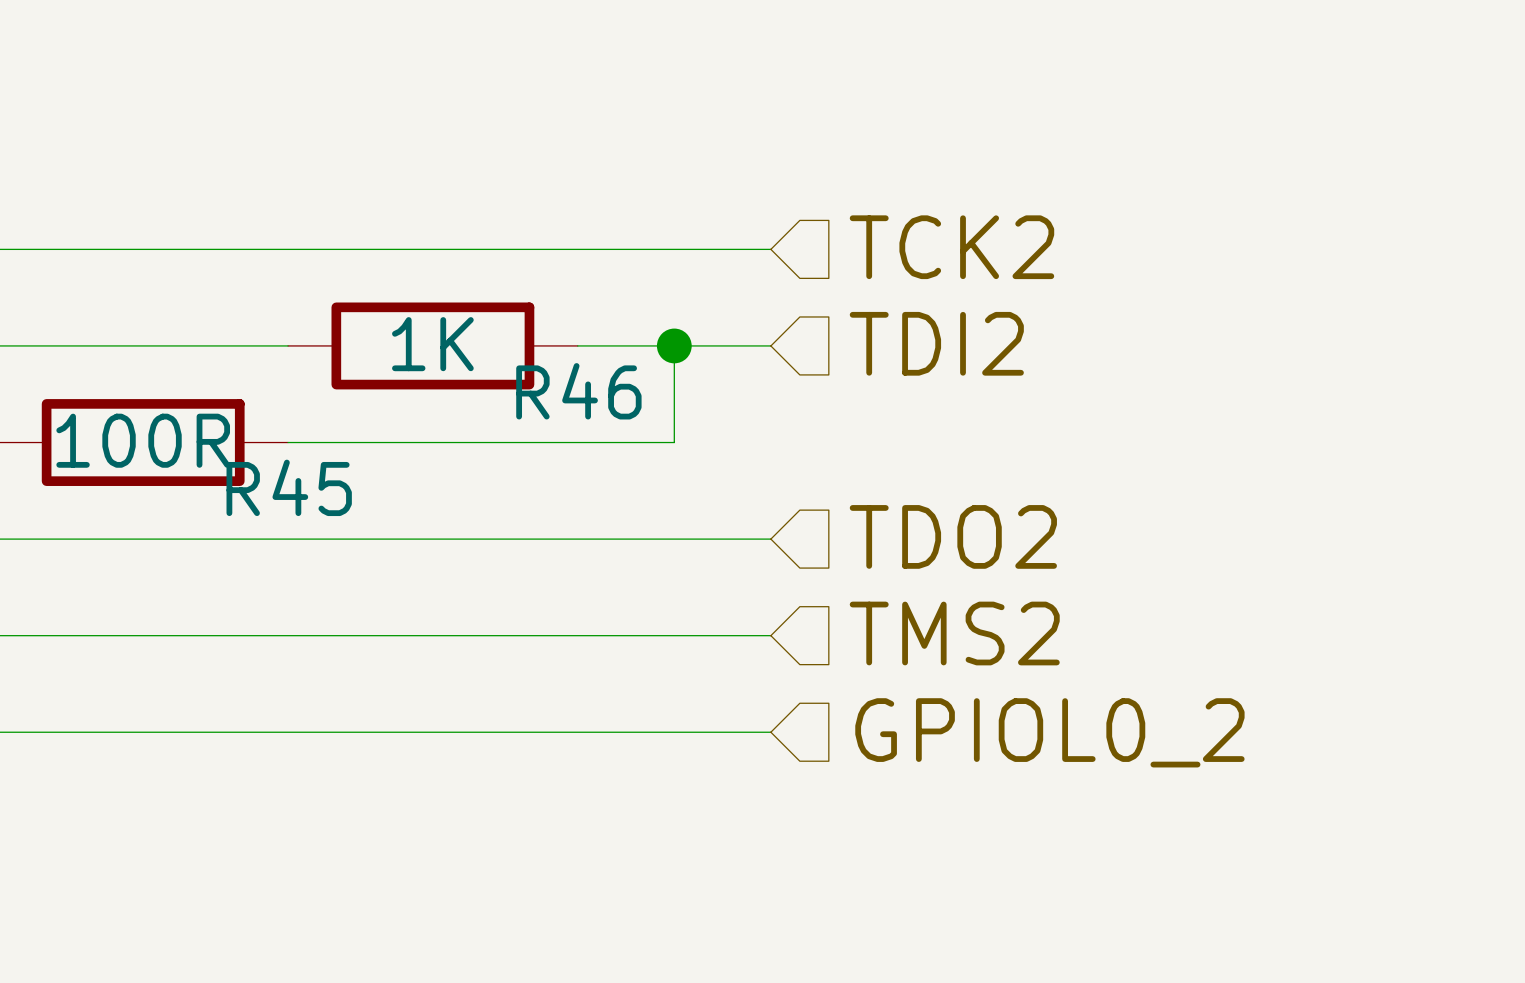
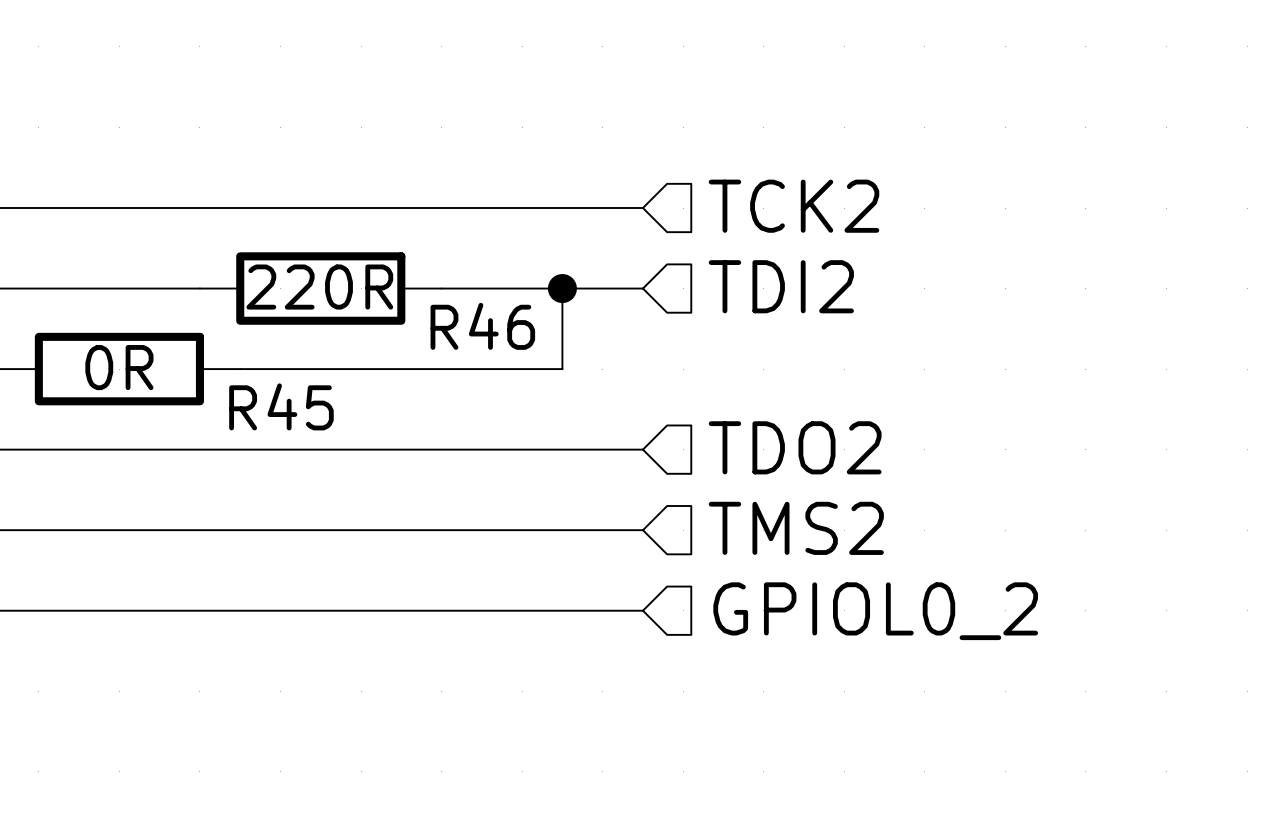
R46 value: 1K (432, 344) -> 220R (319, 287)
R46 position: (432, 345) -> (320, 288)
R45 value: 100R (143, 440) -> 0R (119, 367)
R45 name position: R45 (289, 487) -> R45 (281, 406)

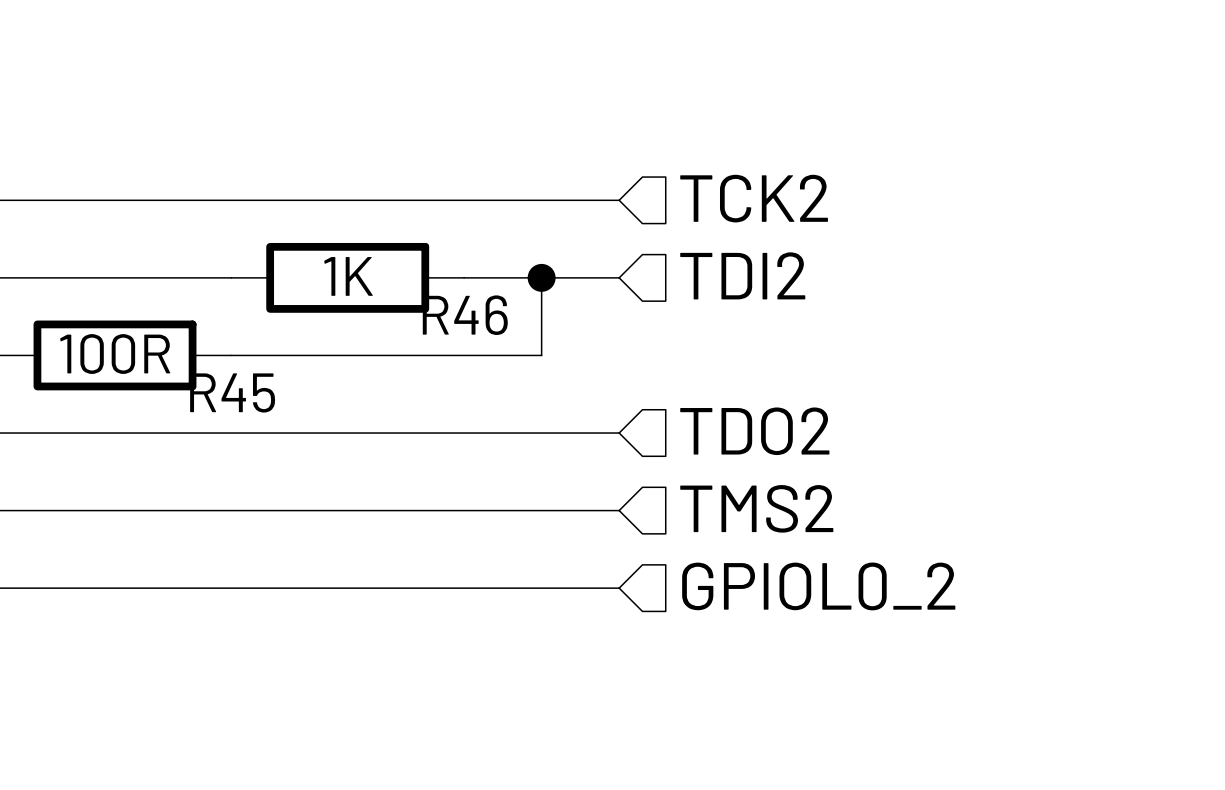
R46 value: 220R (319, 287) -> 1K (348, 276)
R46 position: (320, 288) -> (347, 277)
R45 value: 0R (119, 367) -> 100R (115, 354)
R45 name position: R45 (281, 406) -> R45 (232, 392)

